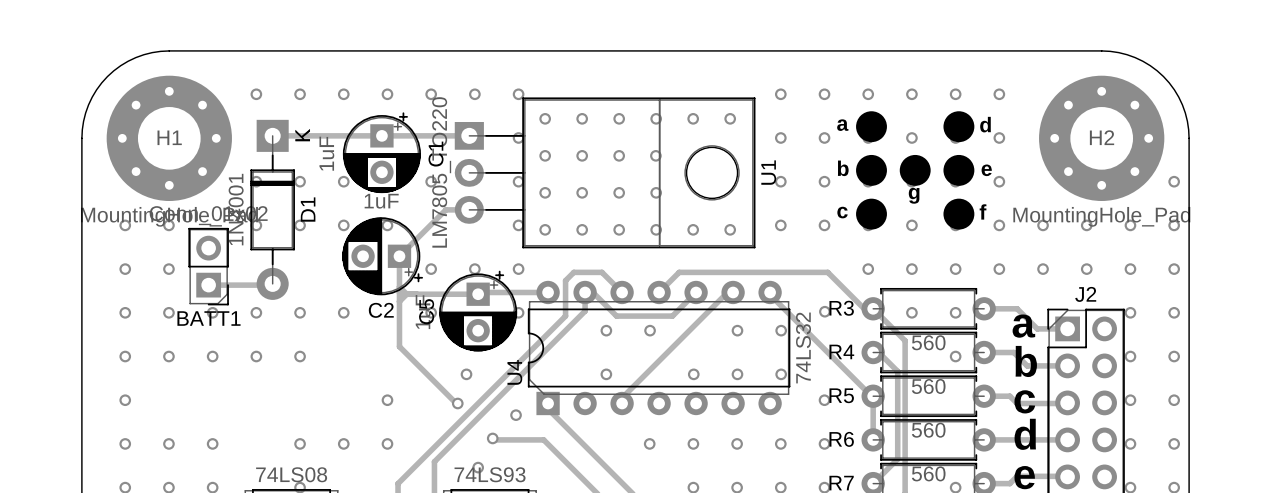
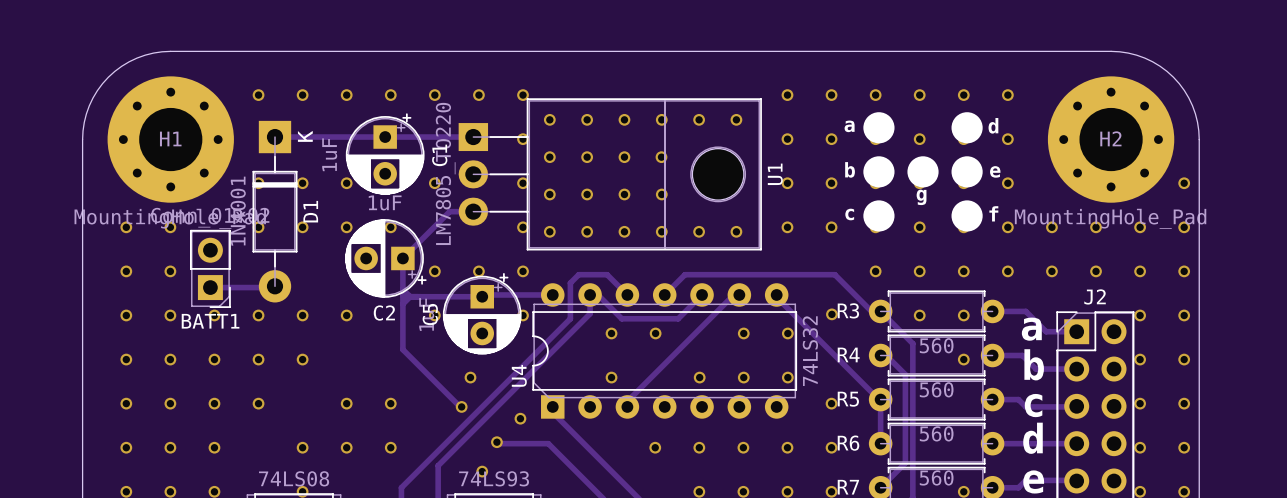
via: none -> (170, 403)
via: none -> (214, 403)
via: none -> (258, 403)
via: none -> (346, 403)

